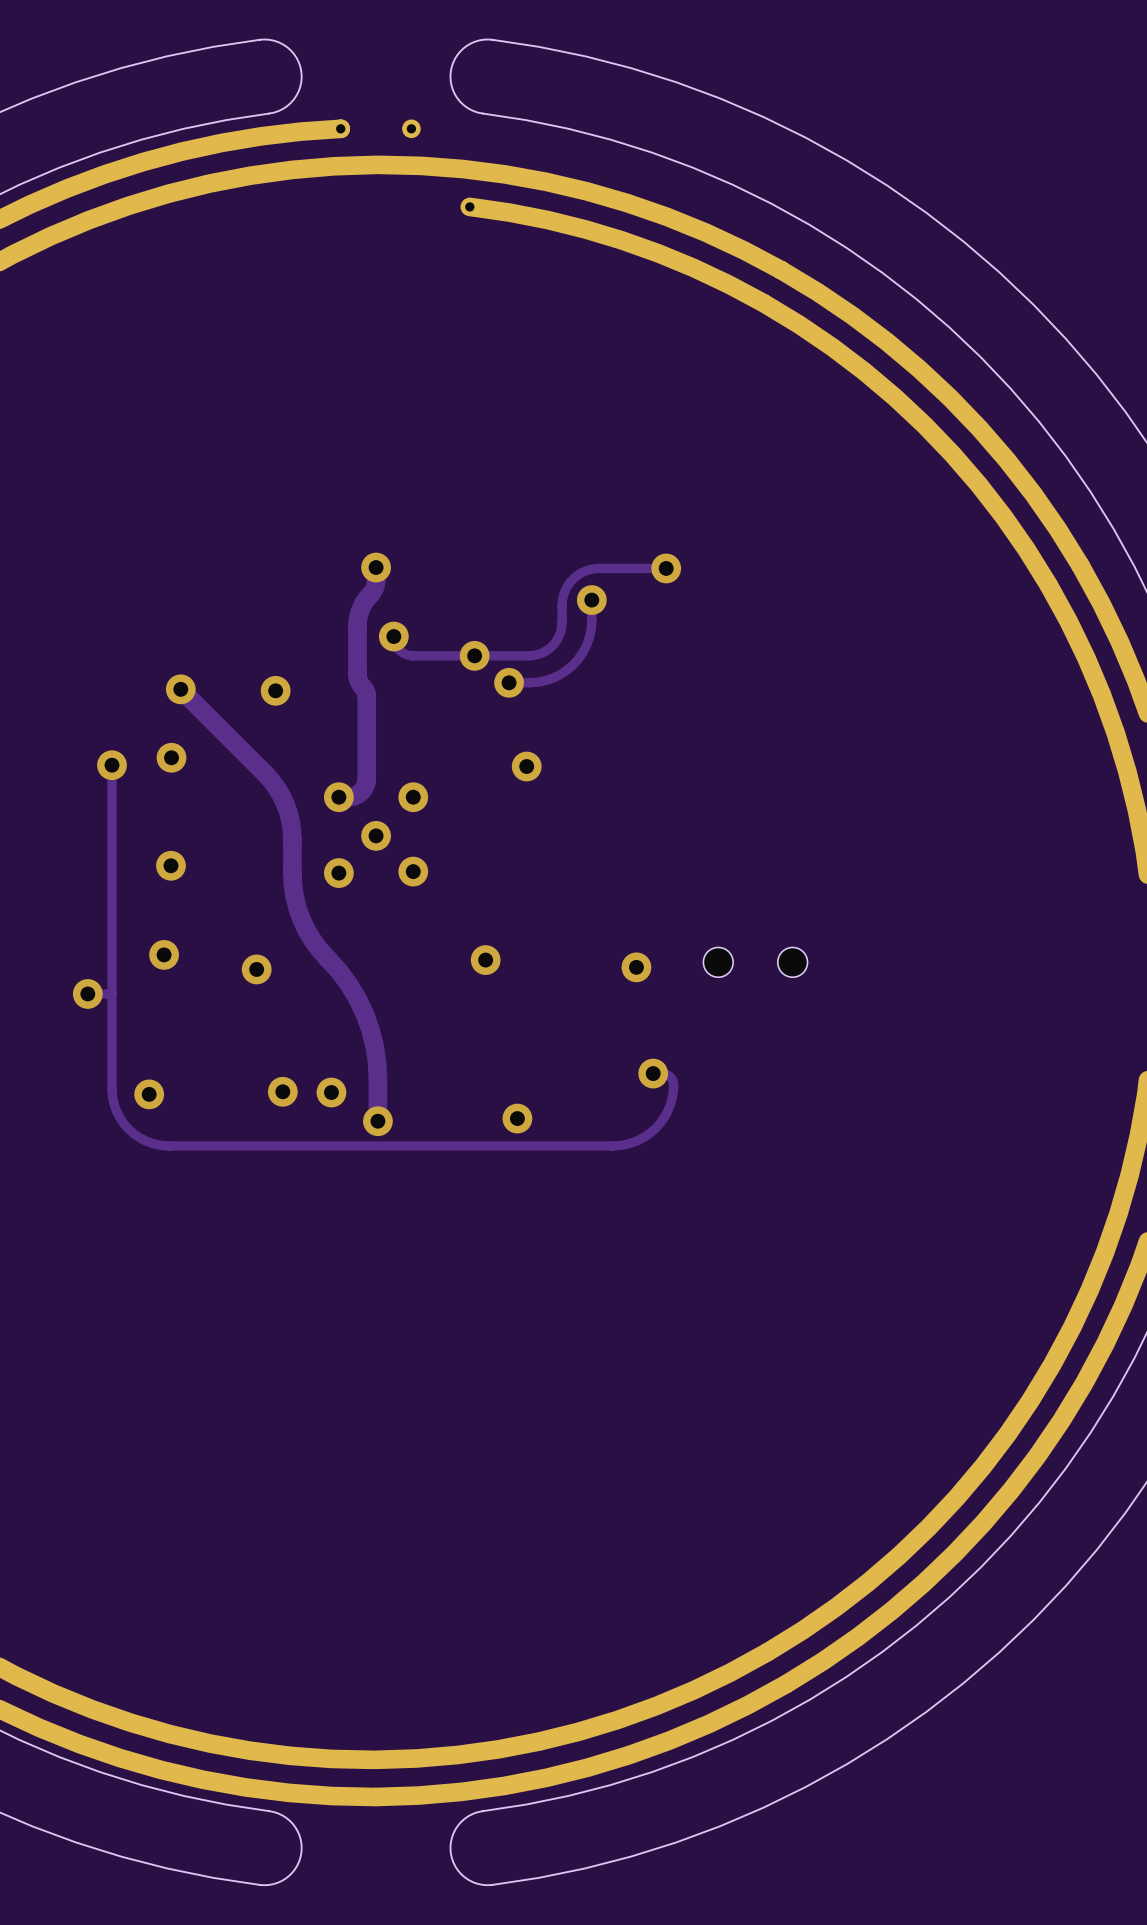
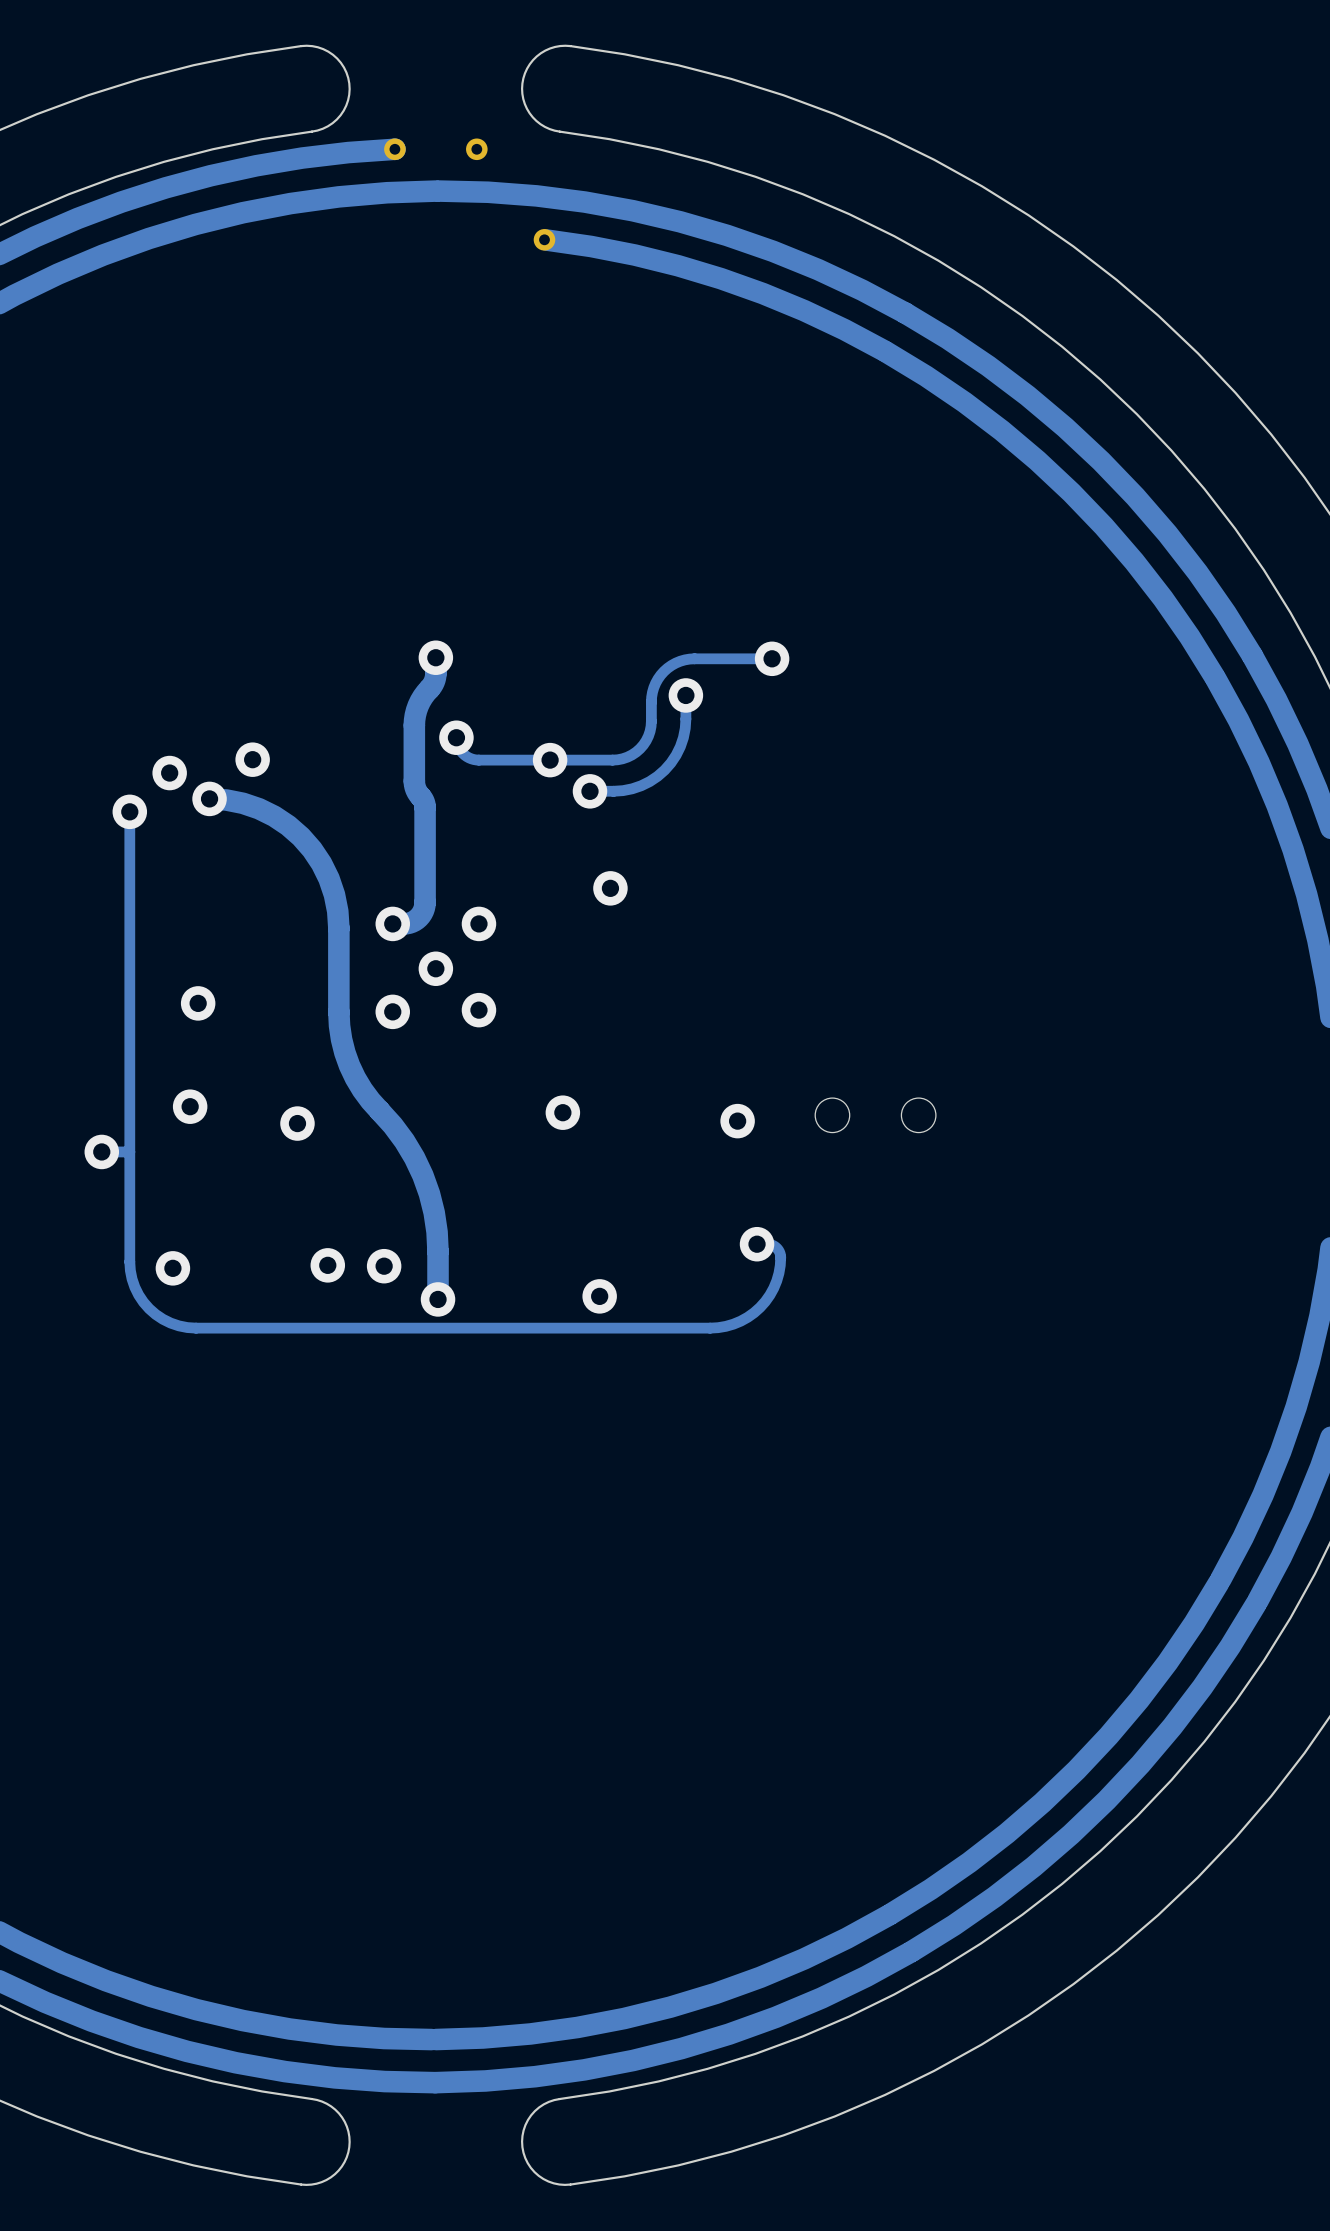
via: none -> (252, 759)
via: none -> (169, 773)
track: (180, 689) (271, 780) (285, 803) (290, 821) (292, 839) -> (209, 798) (226, 800) (259, 808) (288, 825) (312, 849) (321, 863) (334, 894) (338, 928) (338, 973)
via: (275, 690) -> none
track: none -> (129, 811) (129, 886)
via: none -> (129, 811)
via: (171, 757) -> none
via: (111, 765) -> none

